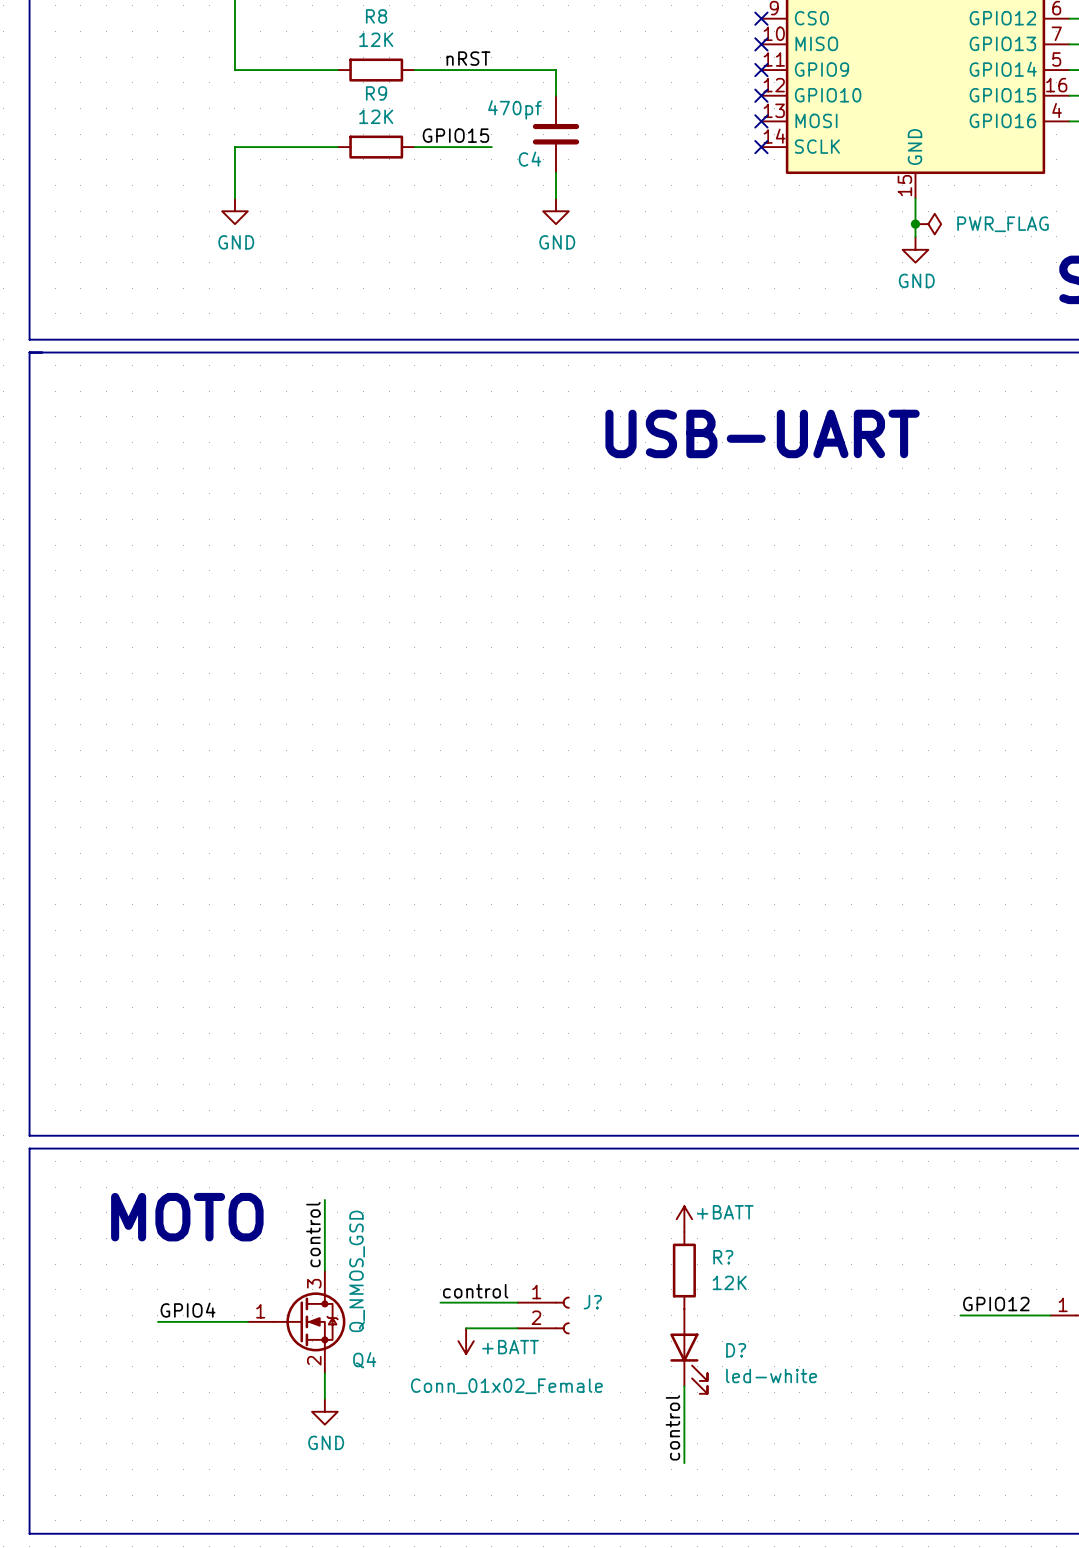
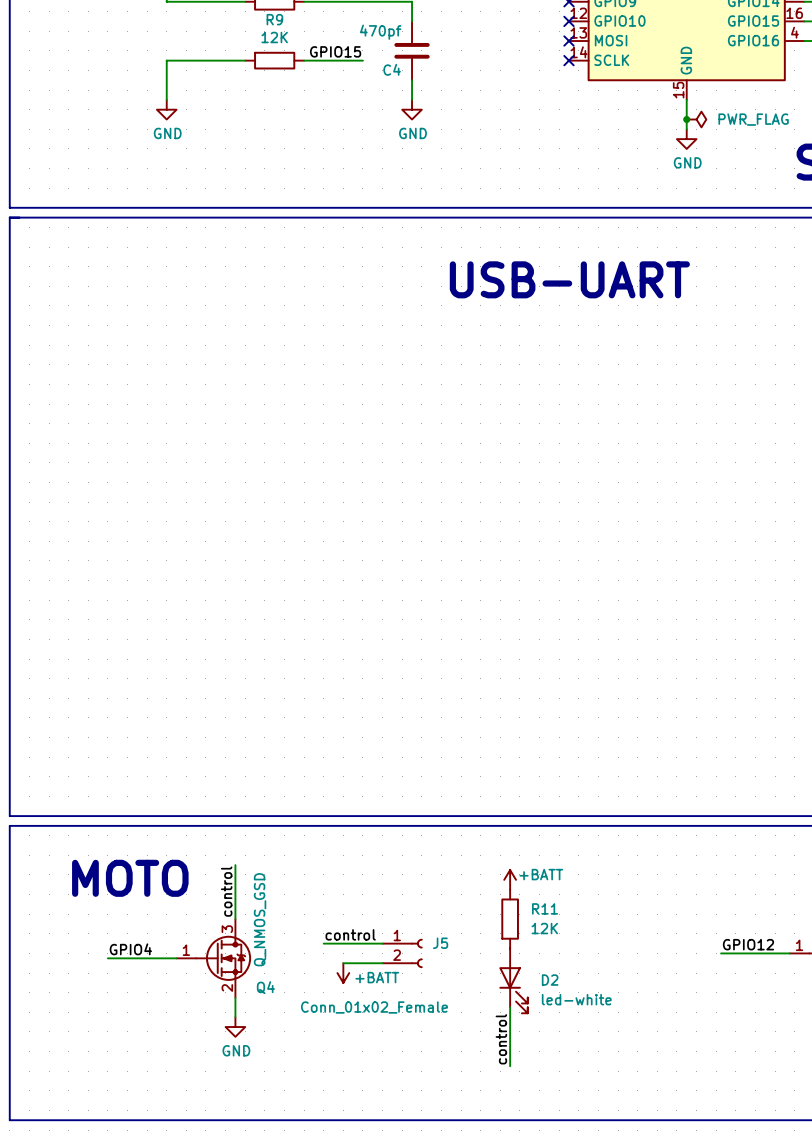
R? name: R? (723, 1257) -> R11 (545, 908)
J? name: J? (592, 1302) -> J5 (440, 943)
D? name: D? (736, 1350) -> D2 (550, 980)

